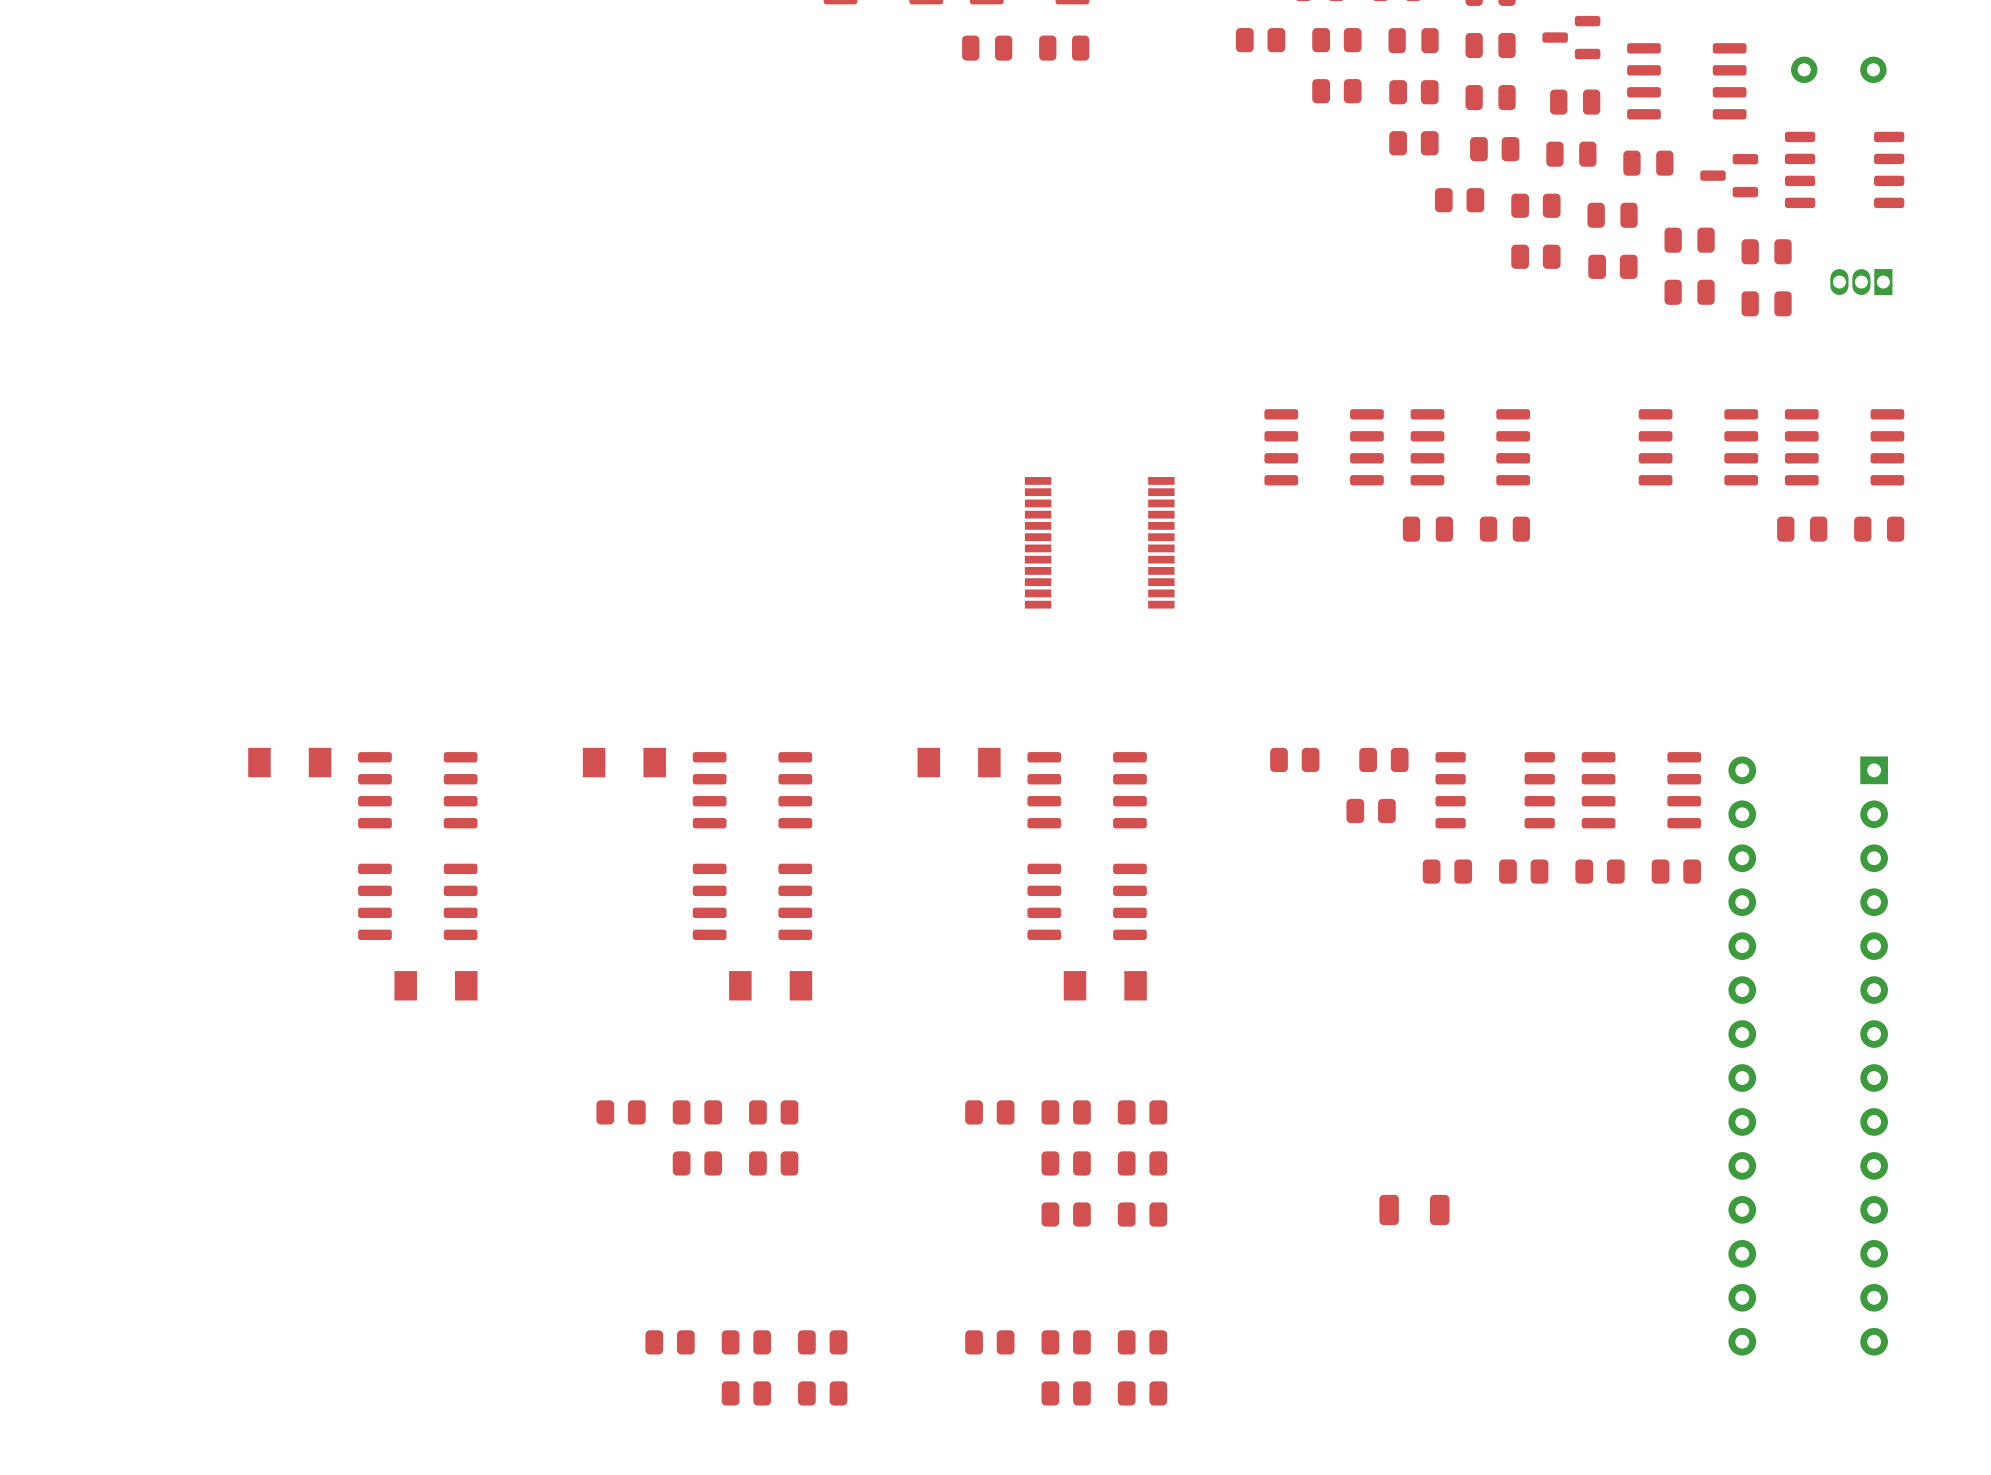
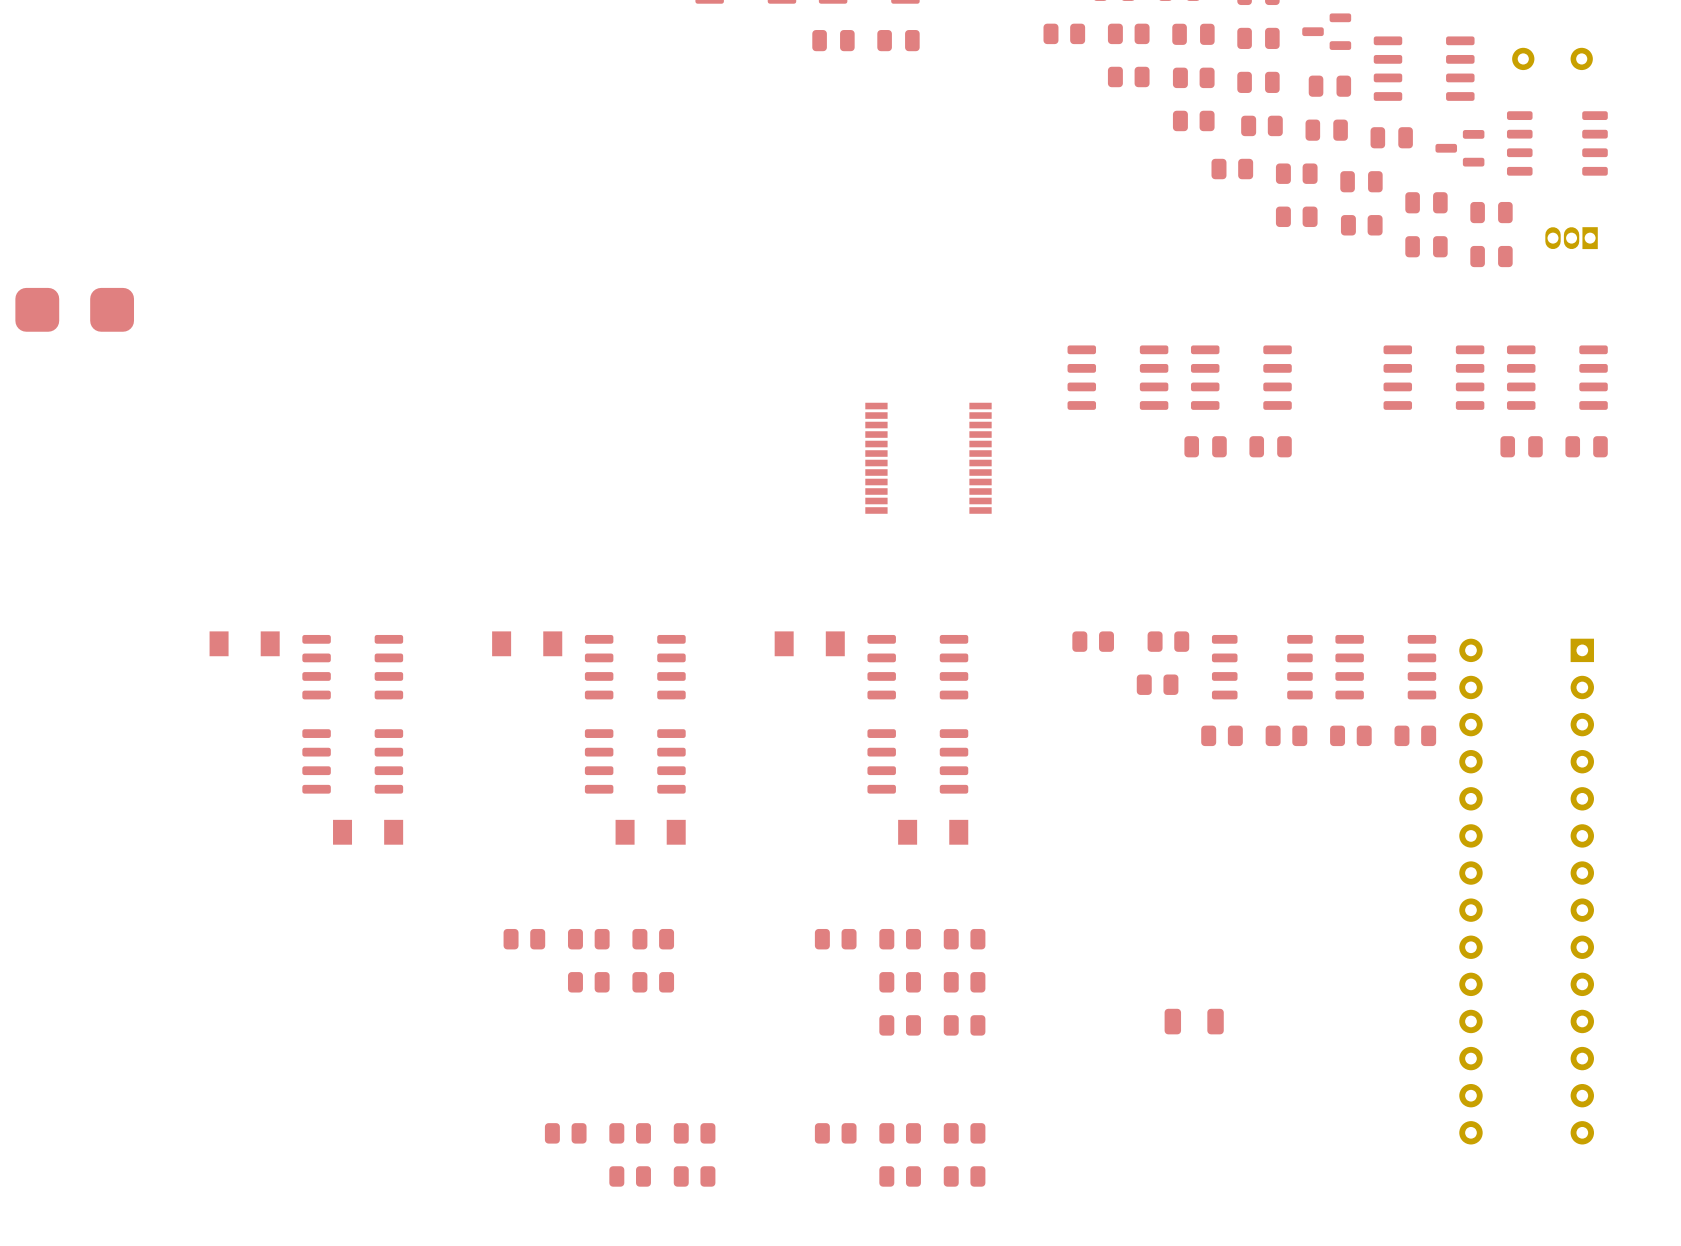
part: none -> (37, 309)
part: none -> (112, 309)

